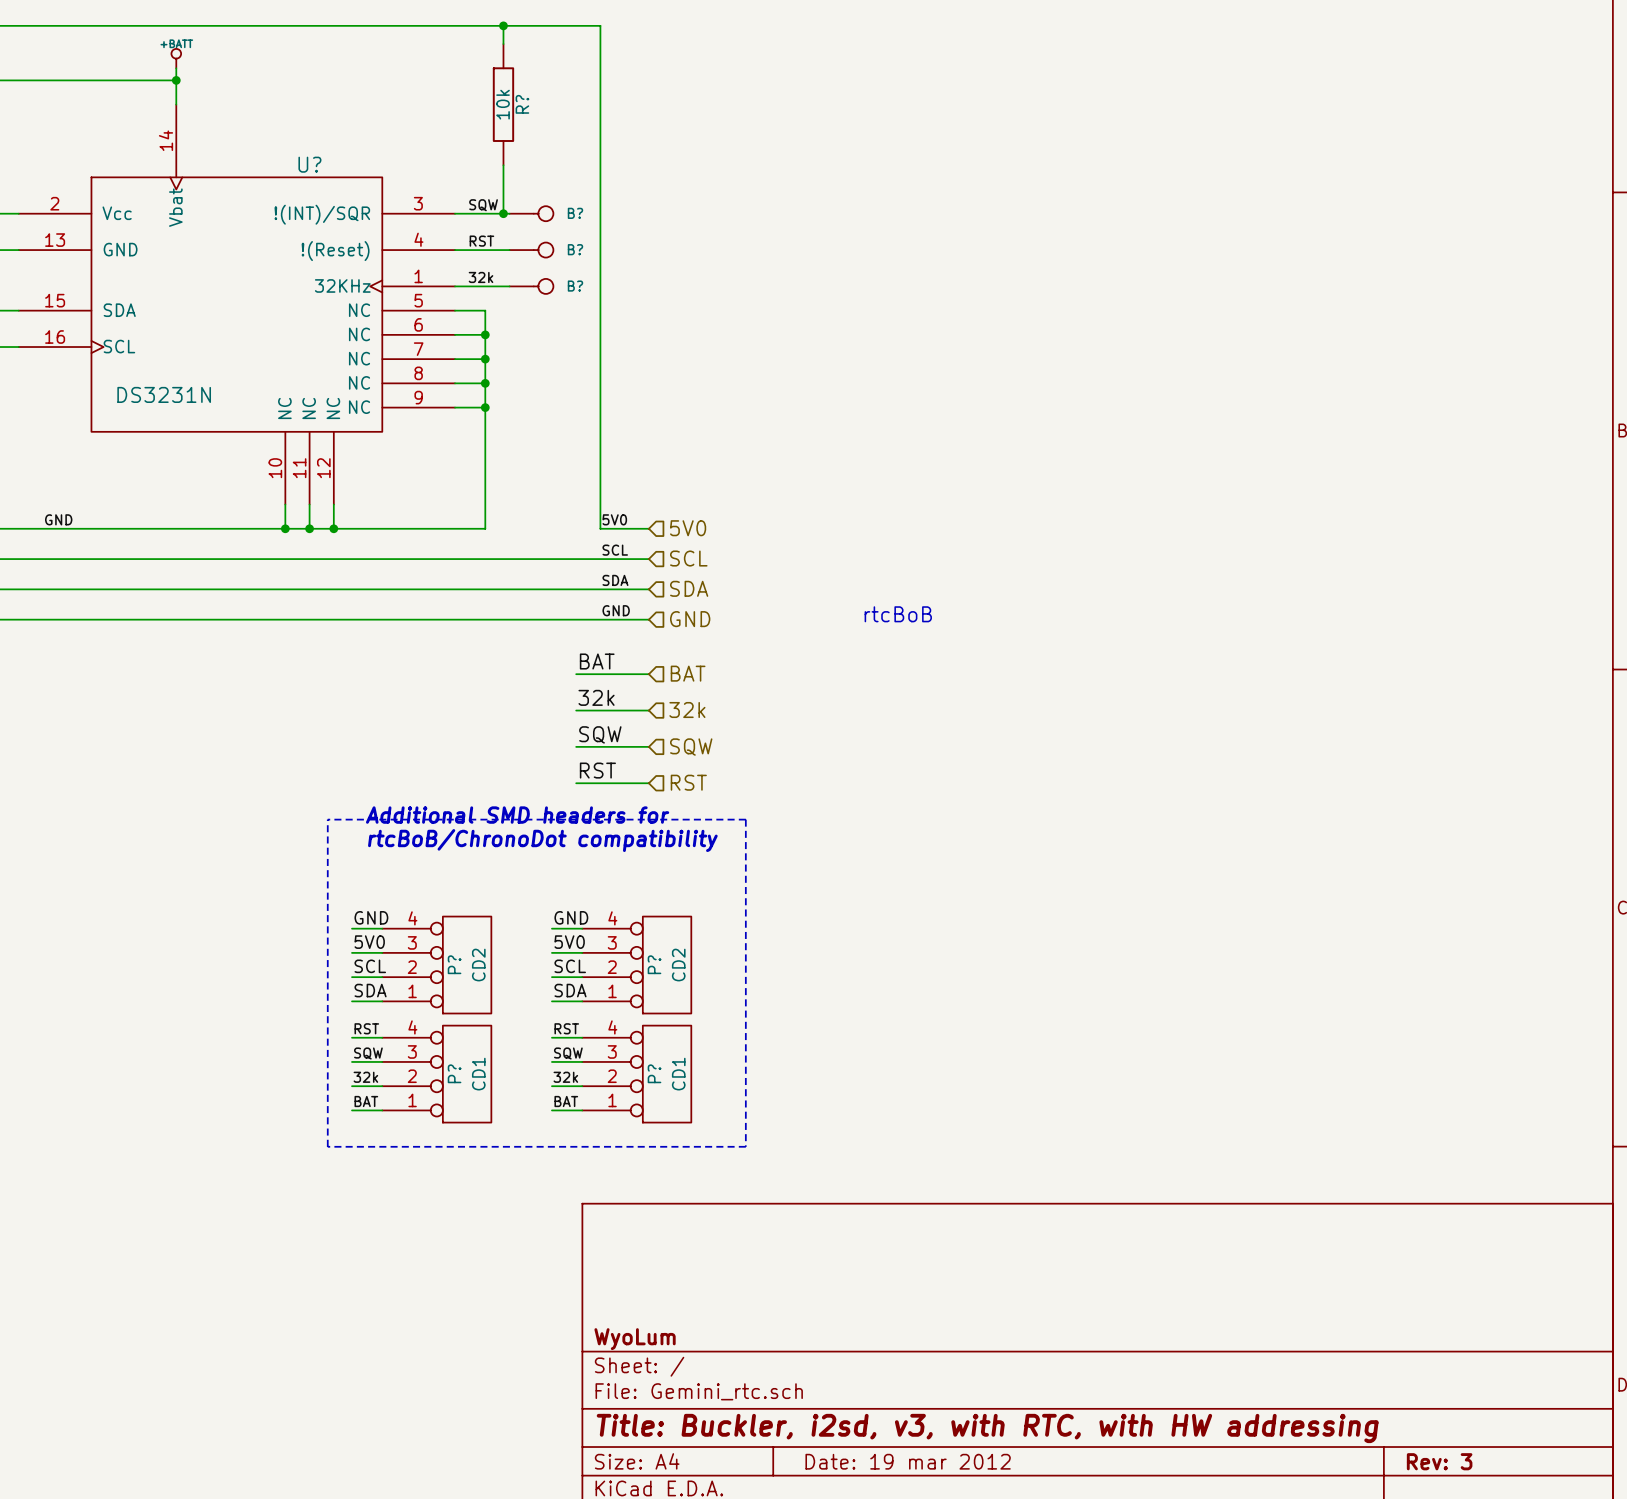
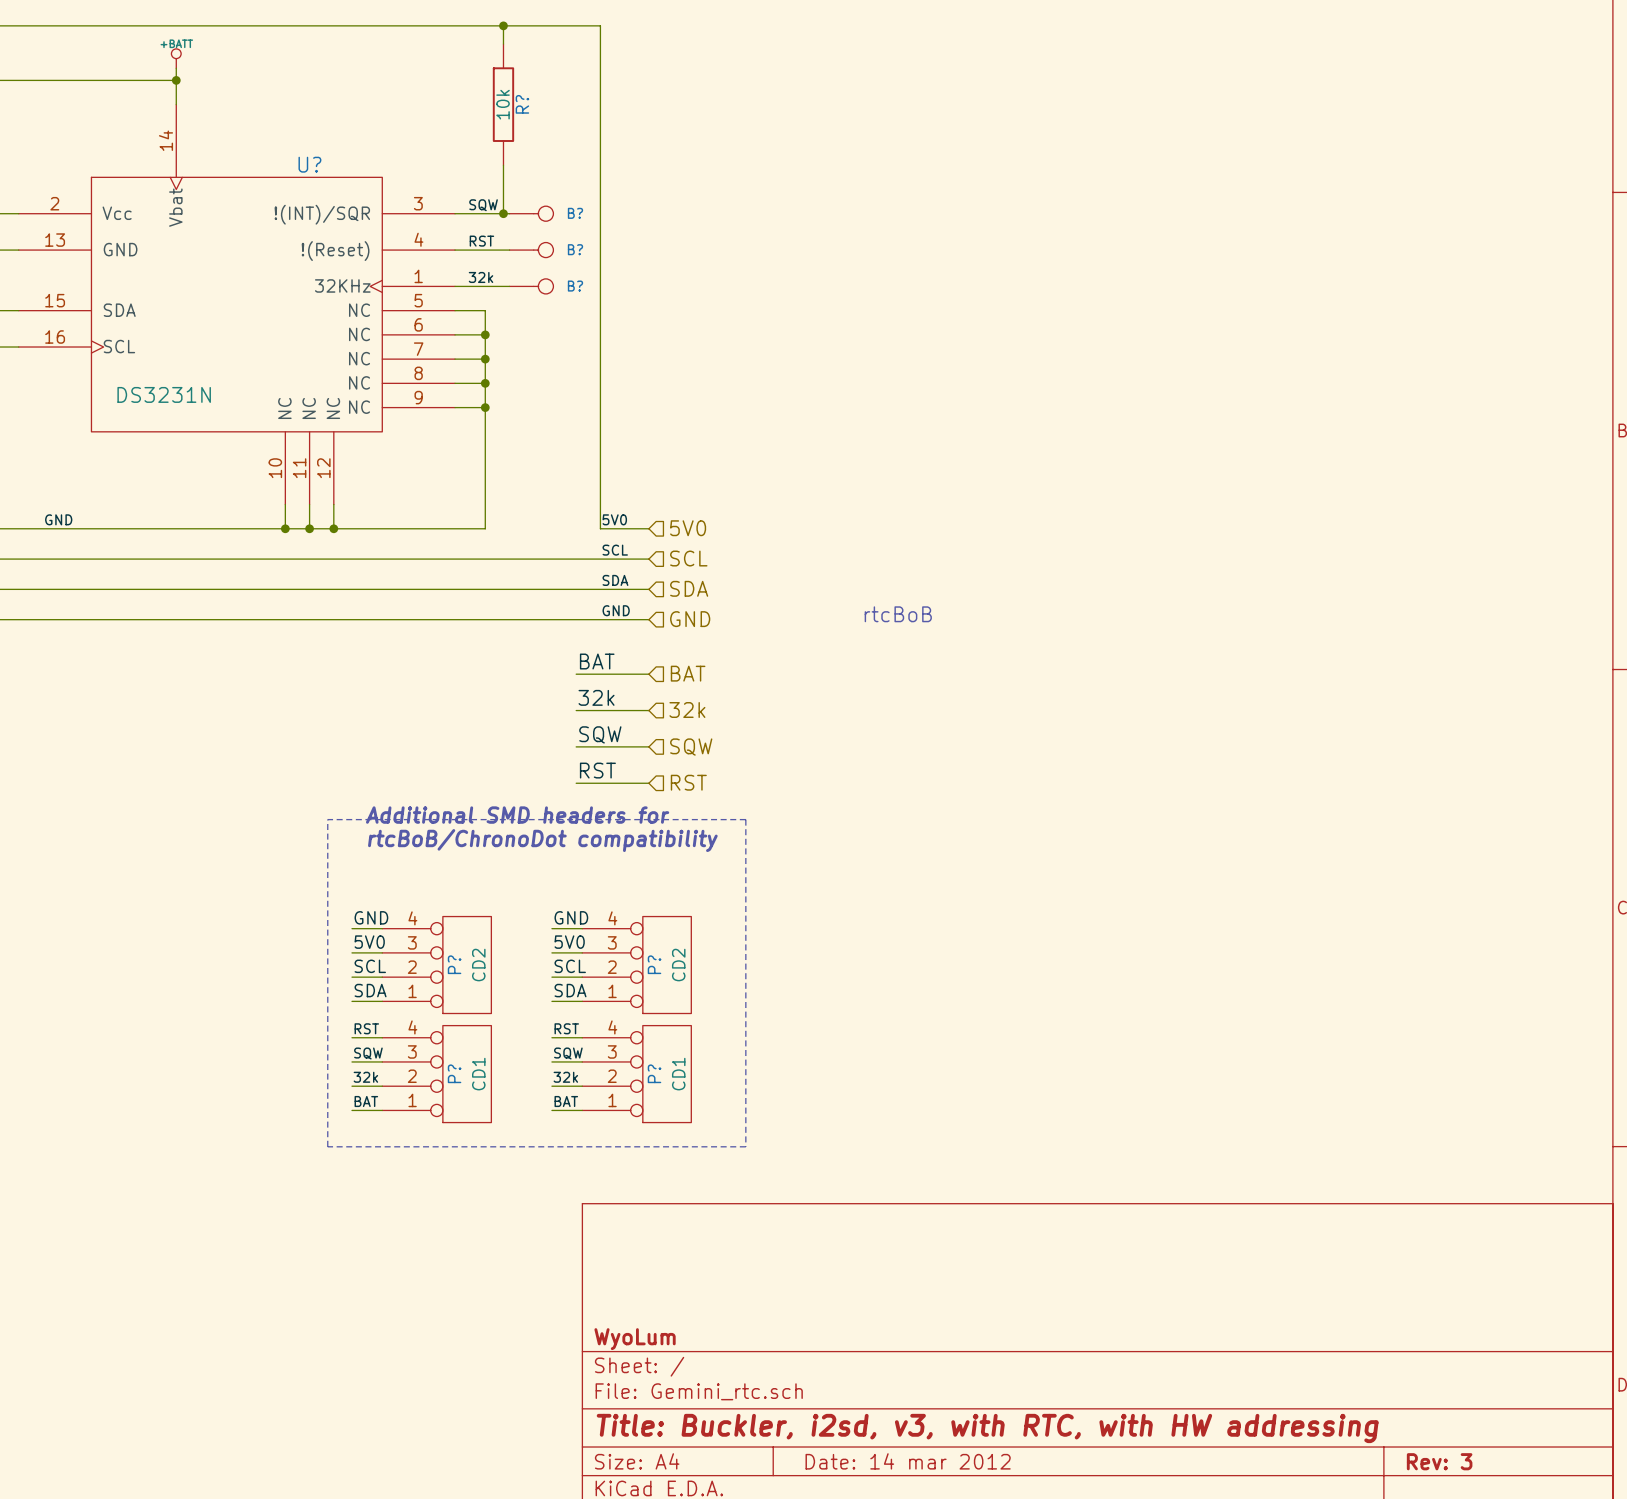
title block: Date: 19 mar 2012 (908, 1461) -> Date: 14 mar 2012 (908, 1461)

